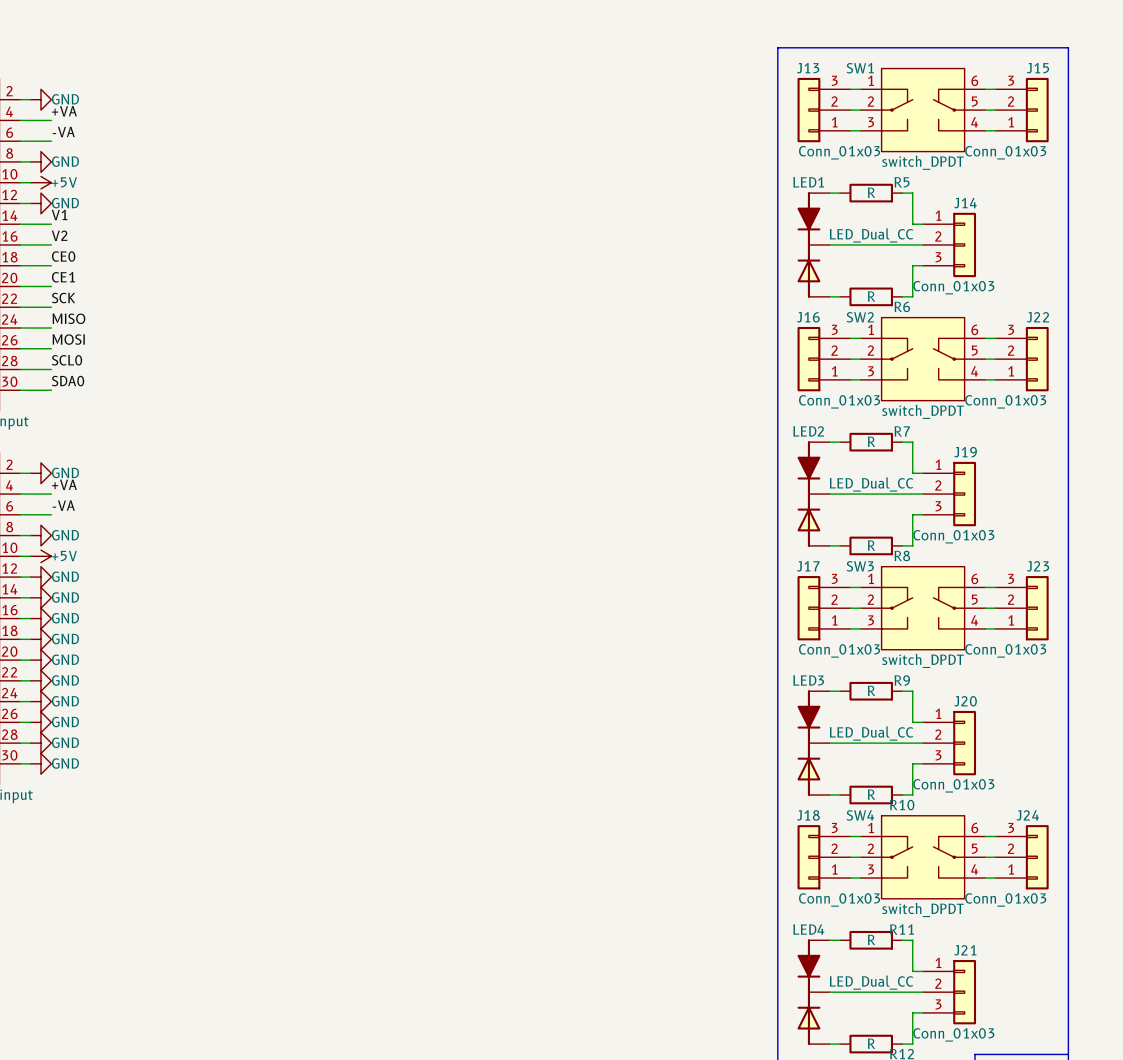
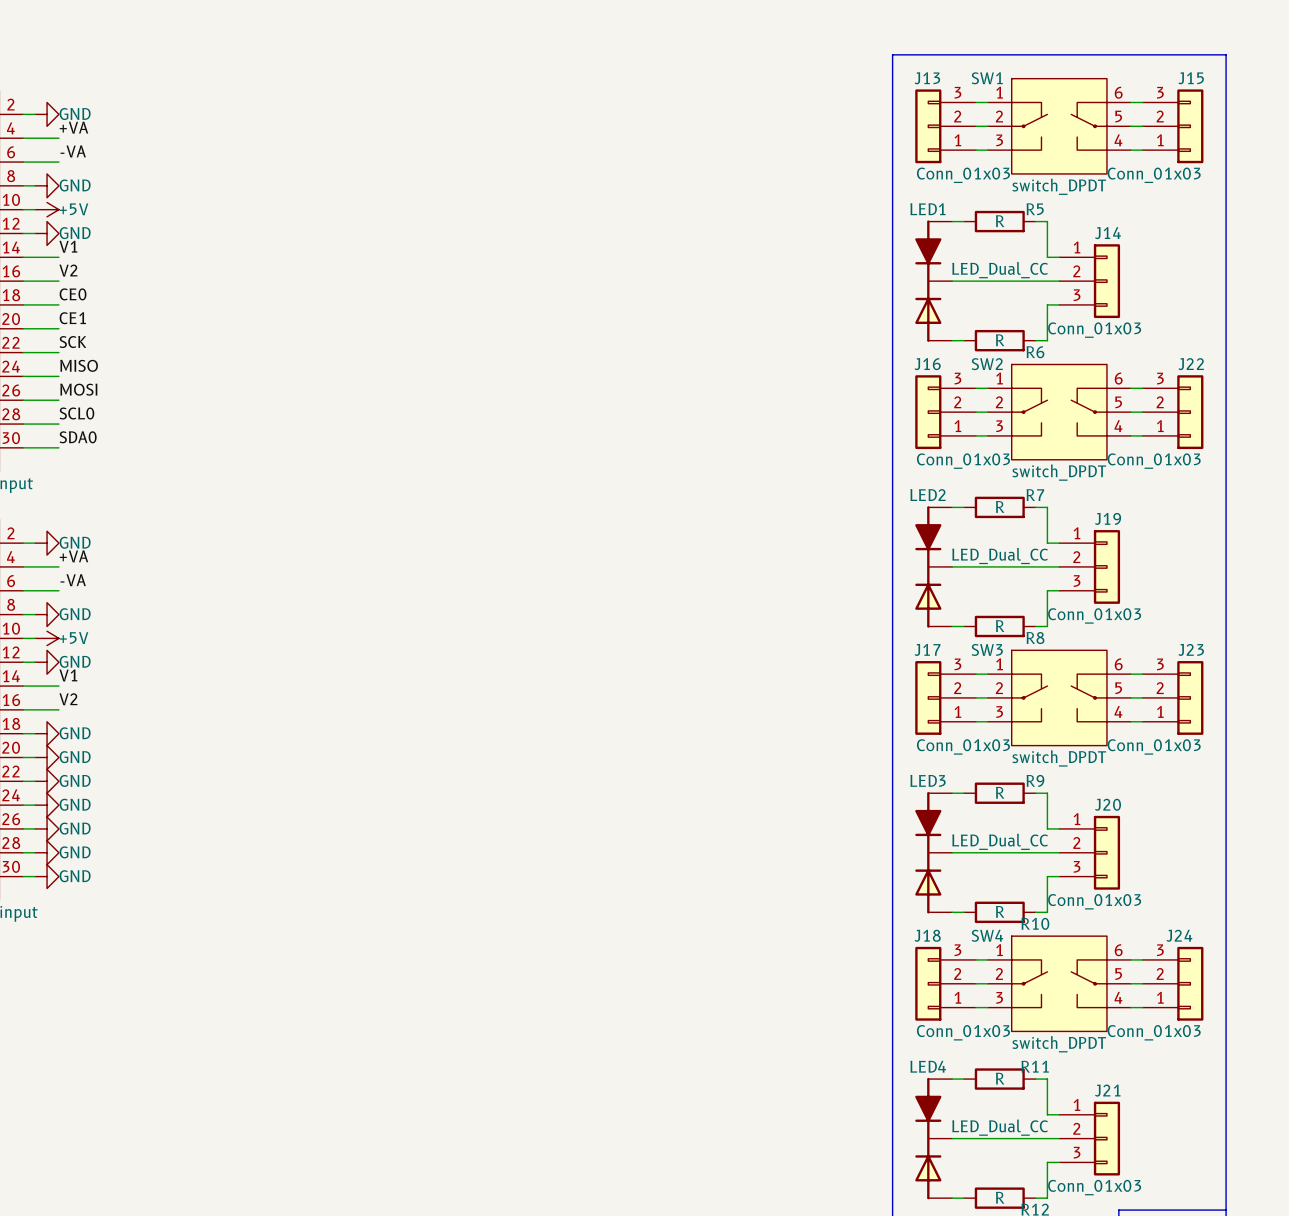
label: none -> V1 (68, 675)
power symbol: GND (40, 597) -> none
label: none -> V2 (68, 699)
power symbol: GND (40, 618) -> none

